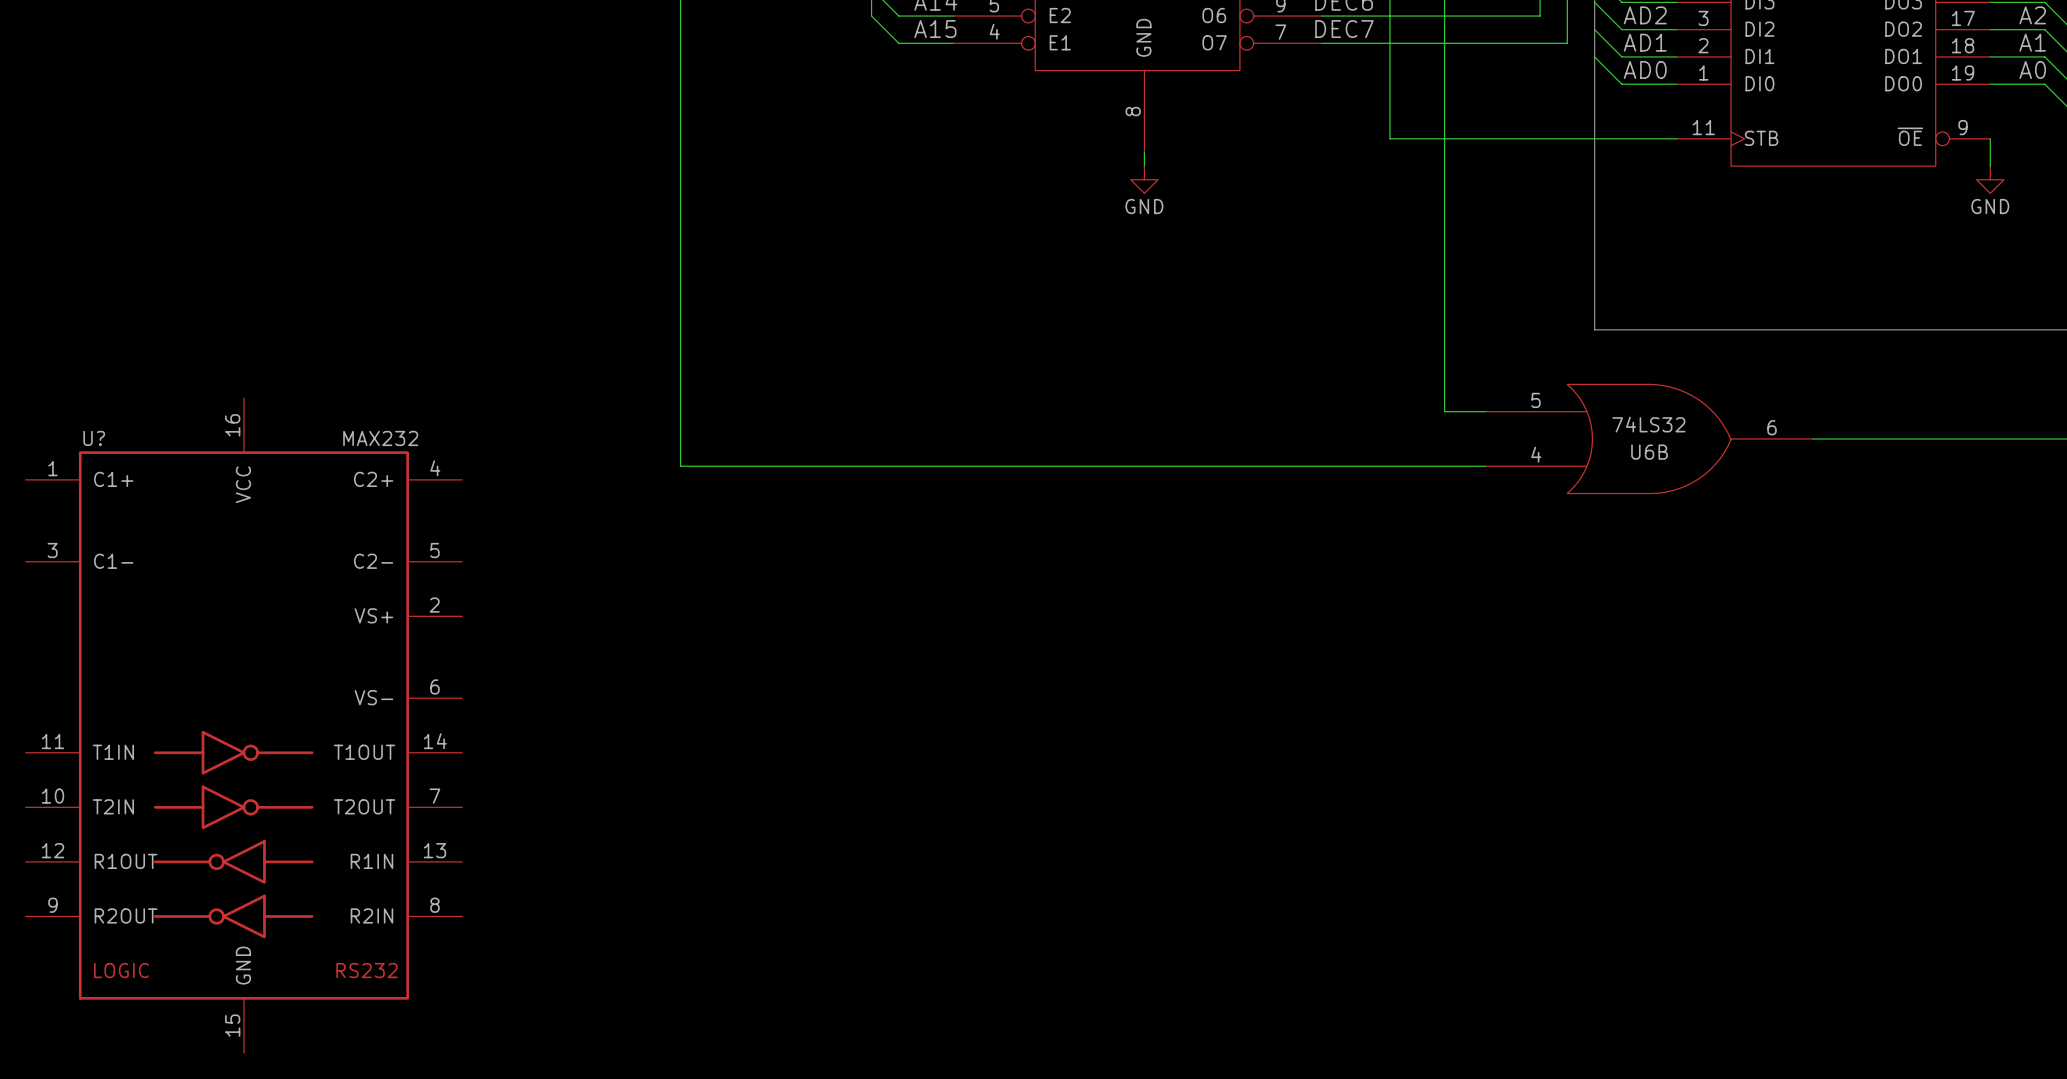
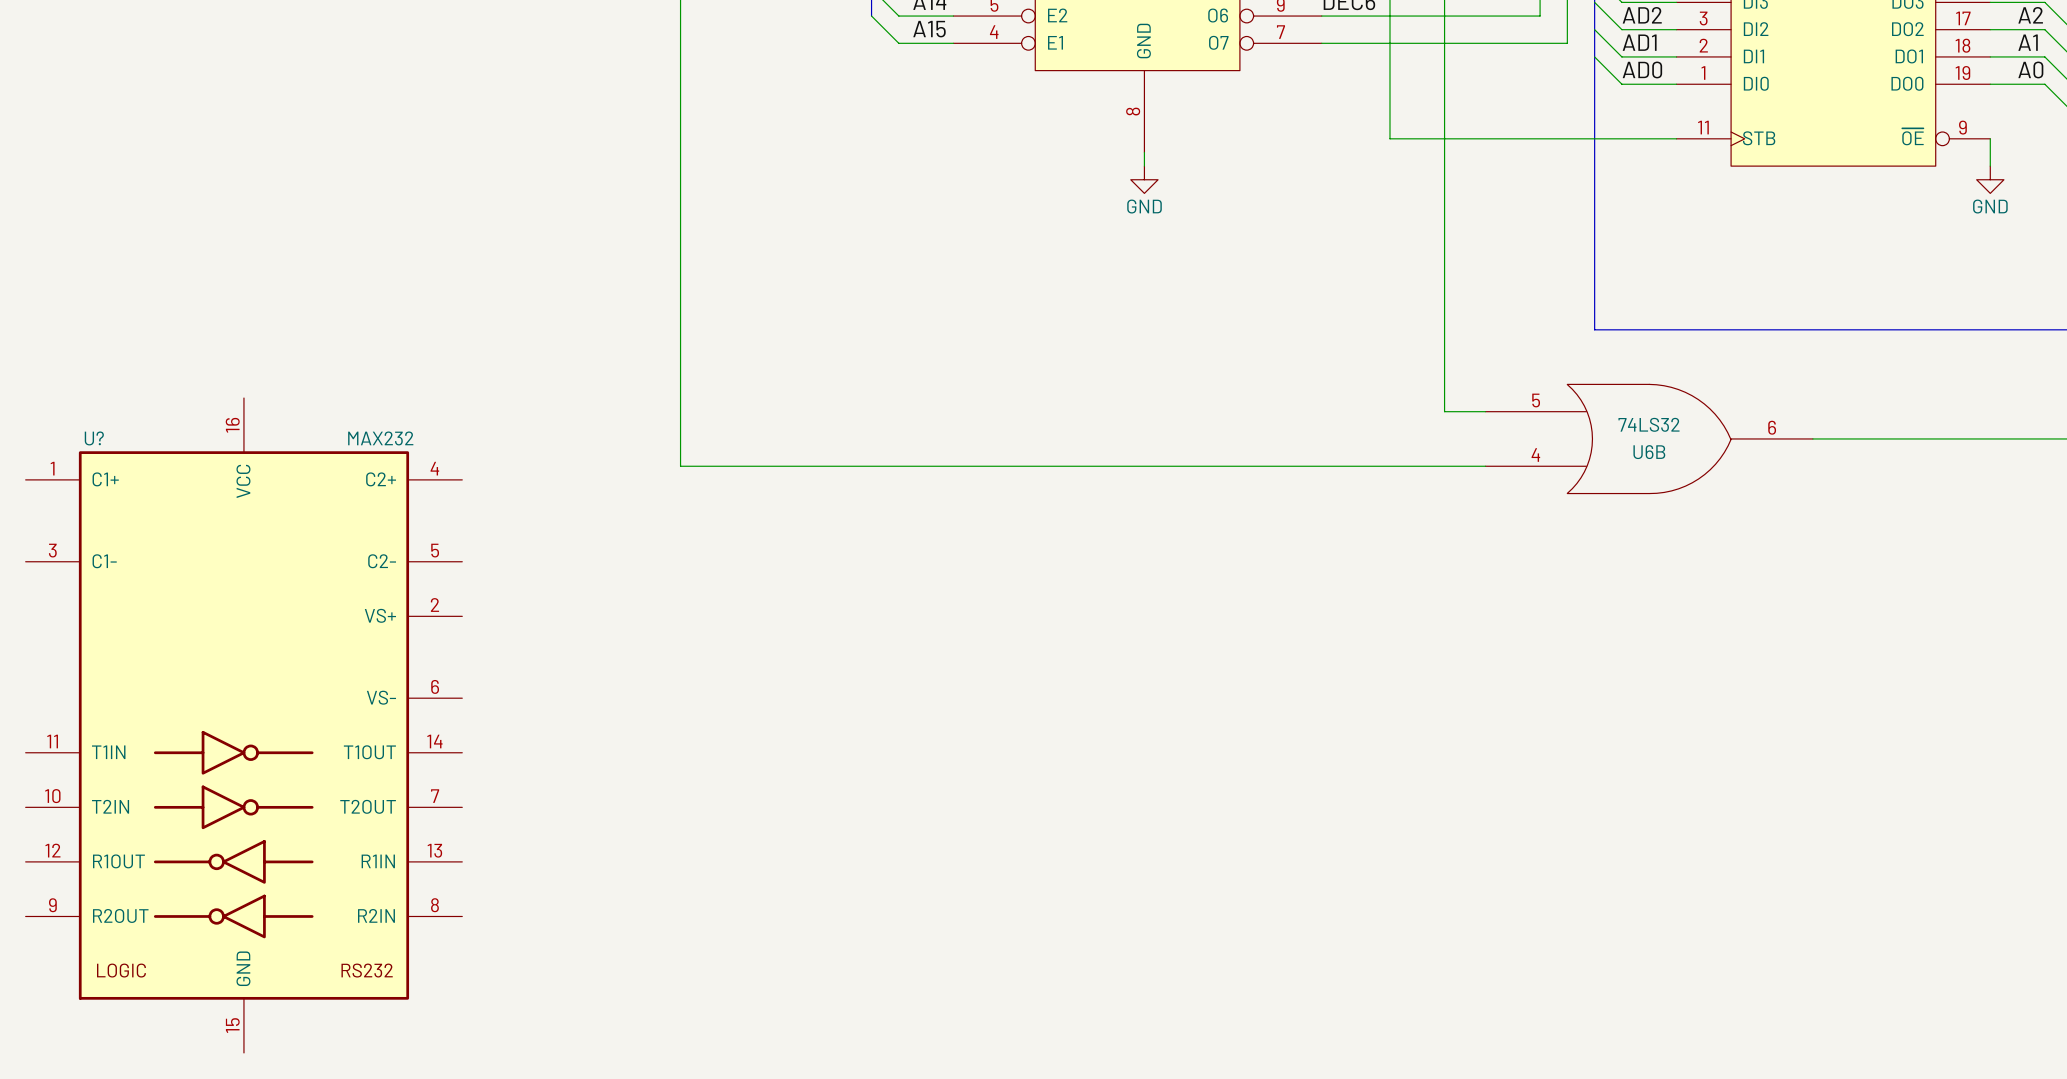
label: DEC7 (1344, 29) -> none

